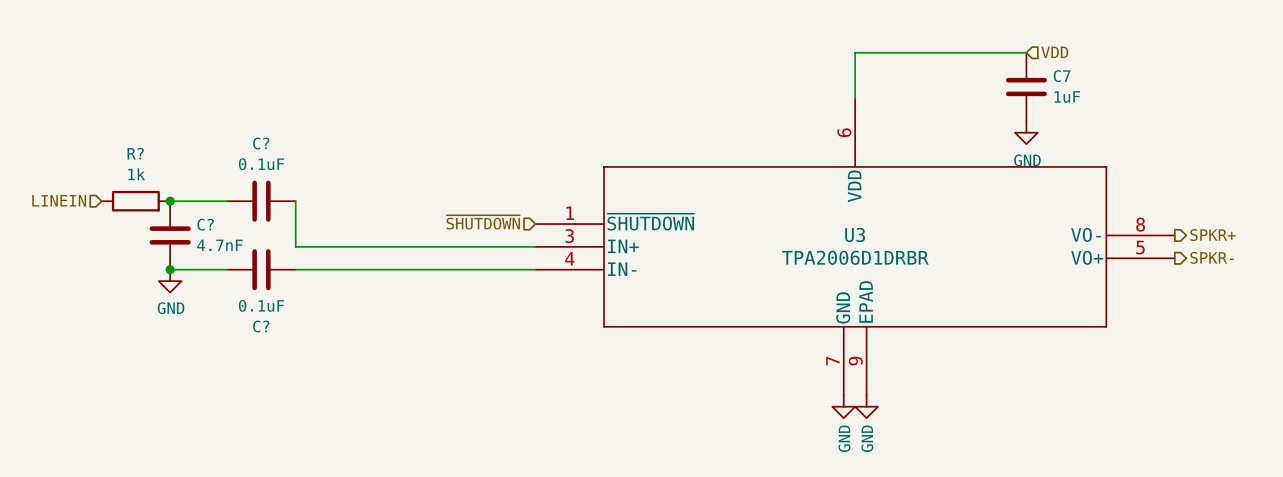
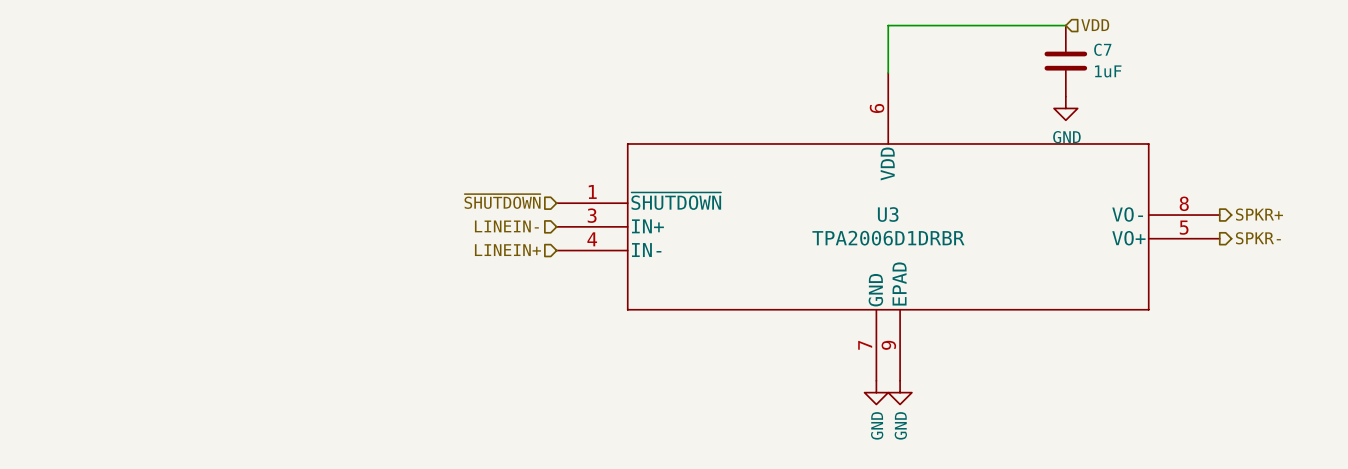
hierarchical label: LINEIN (59, 200) -> none
R?: 1k (135, 201) -> none
wire: (170, 201) (227, 201) -> none
junction: (170, 201) -> none
C?: 0.1uF (261, 201) -> none
wire: (295, 201) (295, 246) (535, 246) -> none
C?: 4.7nF (170, 235) -> none
hierarchical label: none -> LINEIN- (506, 226)
wire: (170, 269) (227, 269) -> none
junction: (170, 269) -> none
C?: 0.1uF (261, 269) -> none
wire: (295, 269) (535, 269) -> none
hierarchical label: none -> LINEIN+ (507, 250)
power symbol: GND (170, 281) -> none

